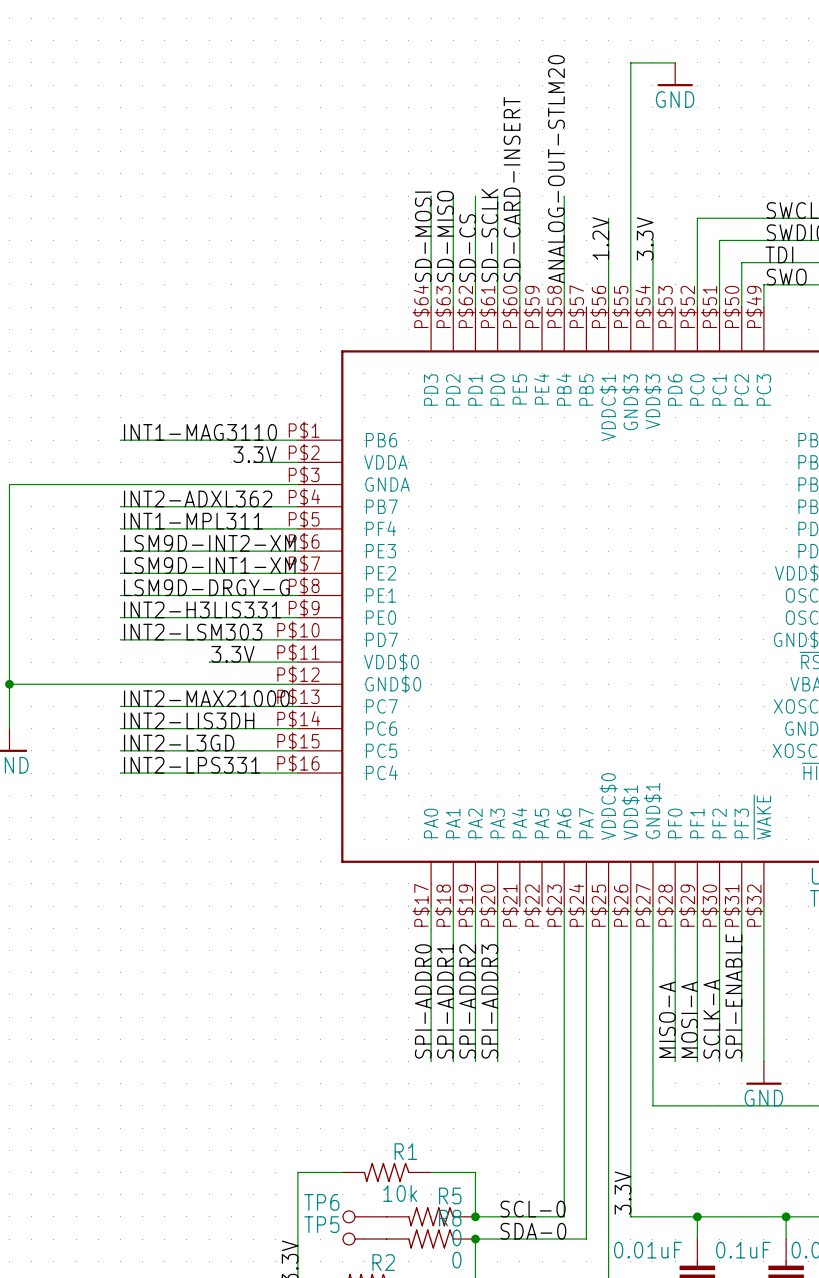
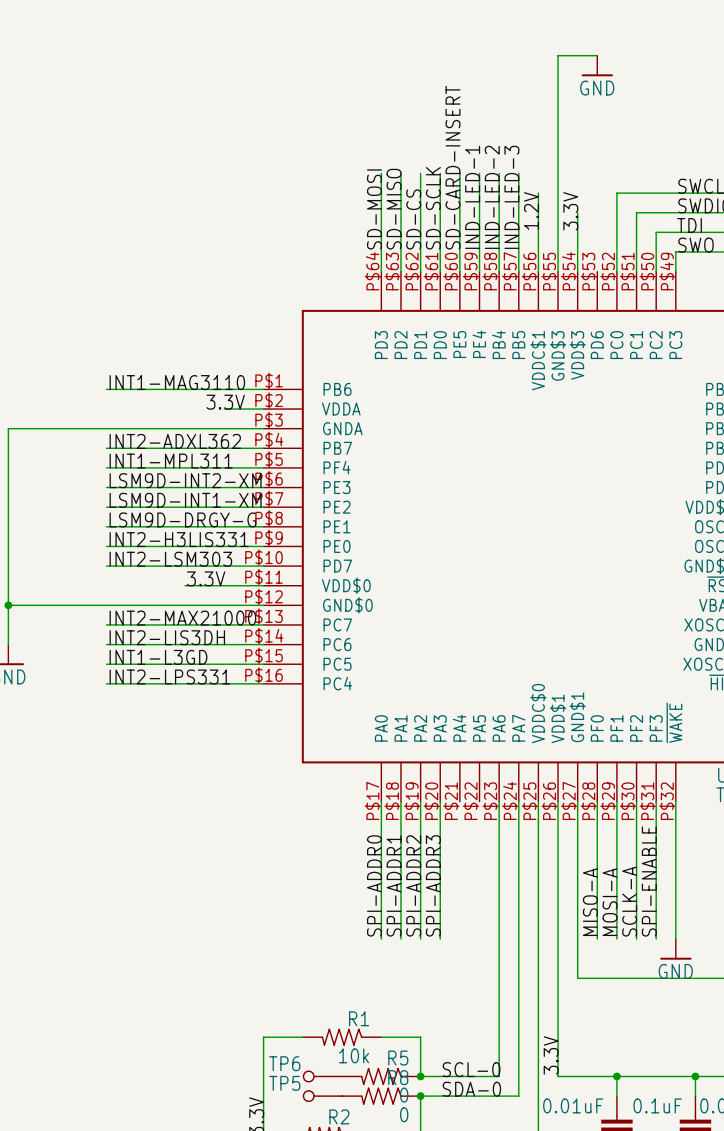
label: ANALOG-OUT-STLM20 (556, 169) -> IND-LED-2 (492, 197)
wire: none -> (479, 173) (479, 271)
wire: none -> (518, 173) (518, 271)
label: none -> IND-LED-1 (472, 197)
label: none -> IND-LED-3 (511, 197)
label: INT2-L3GD (179, 743) -> INT1-L3GD (158, 657)

